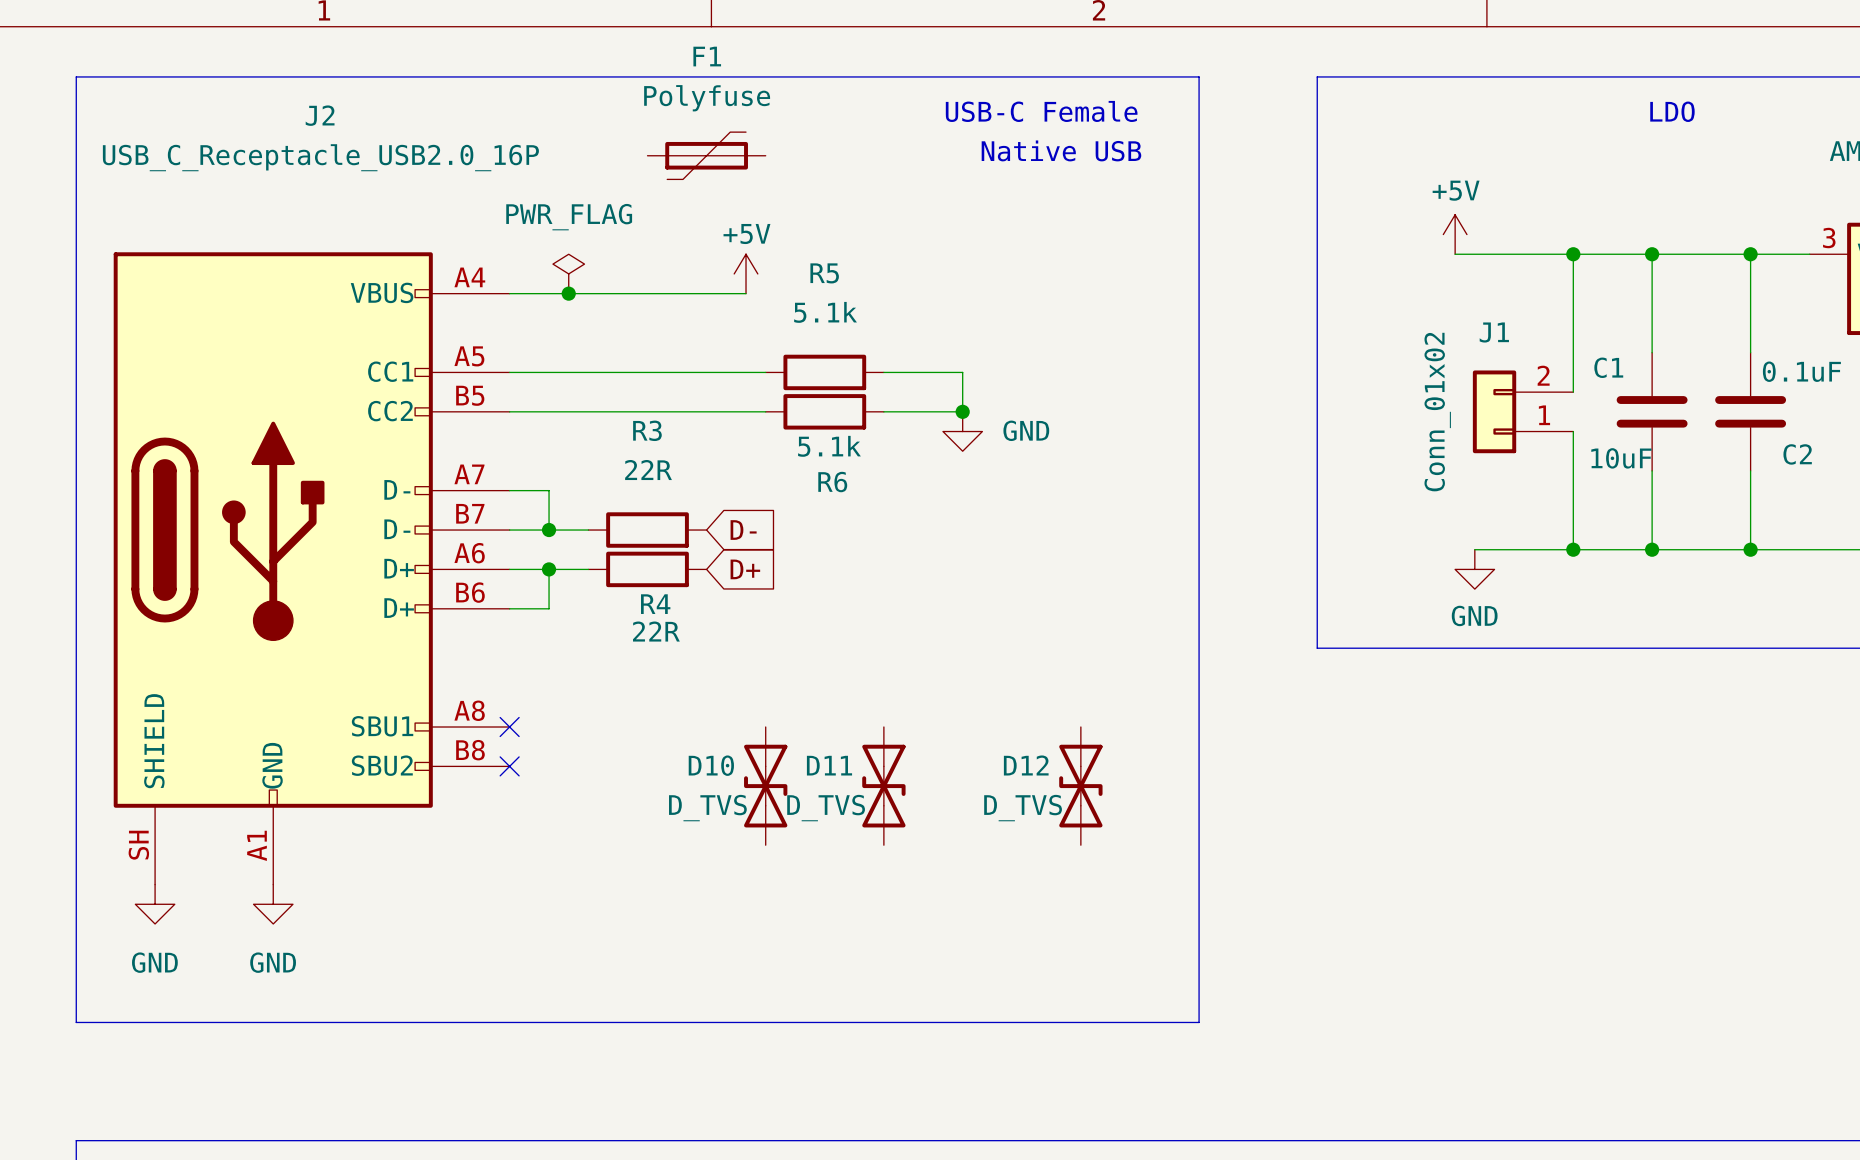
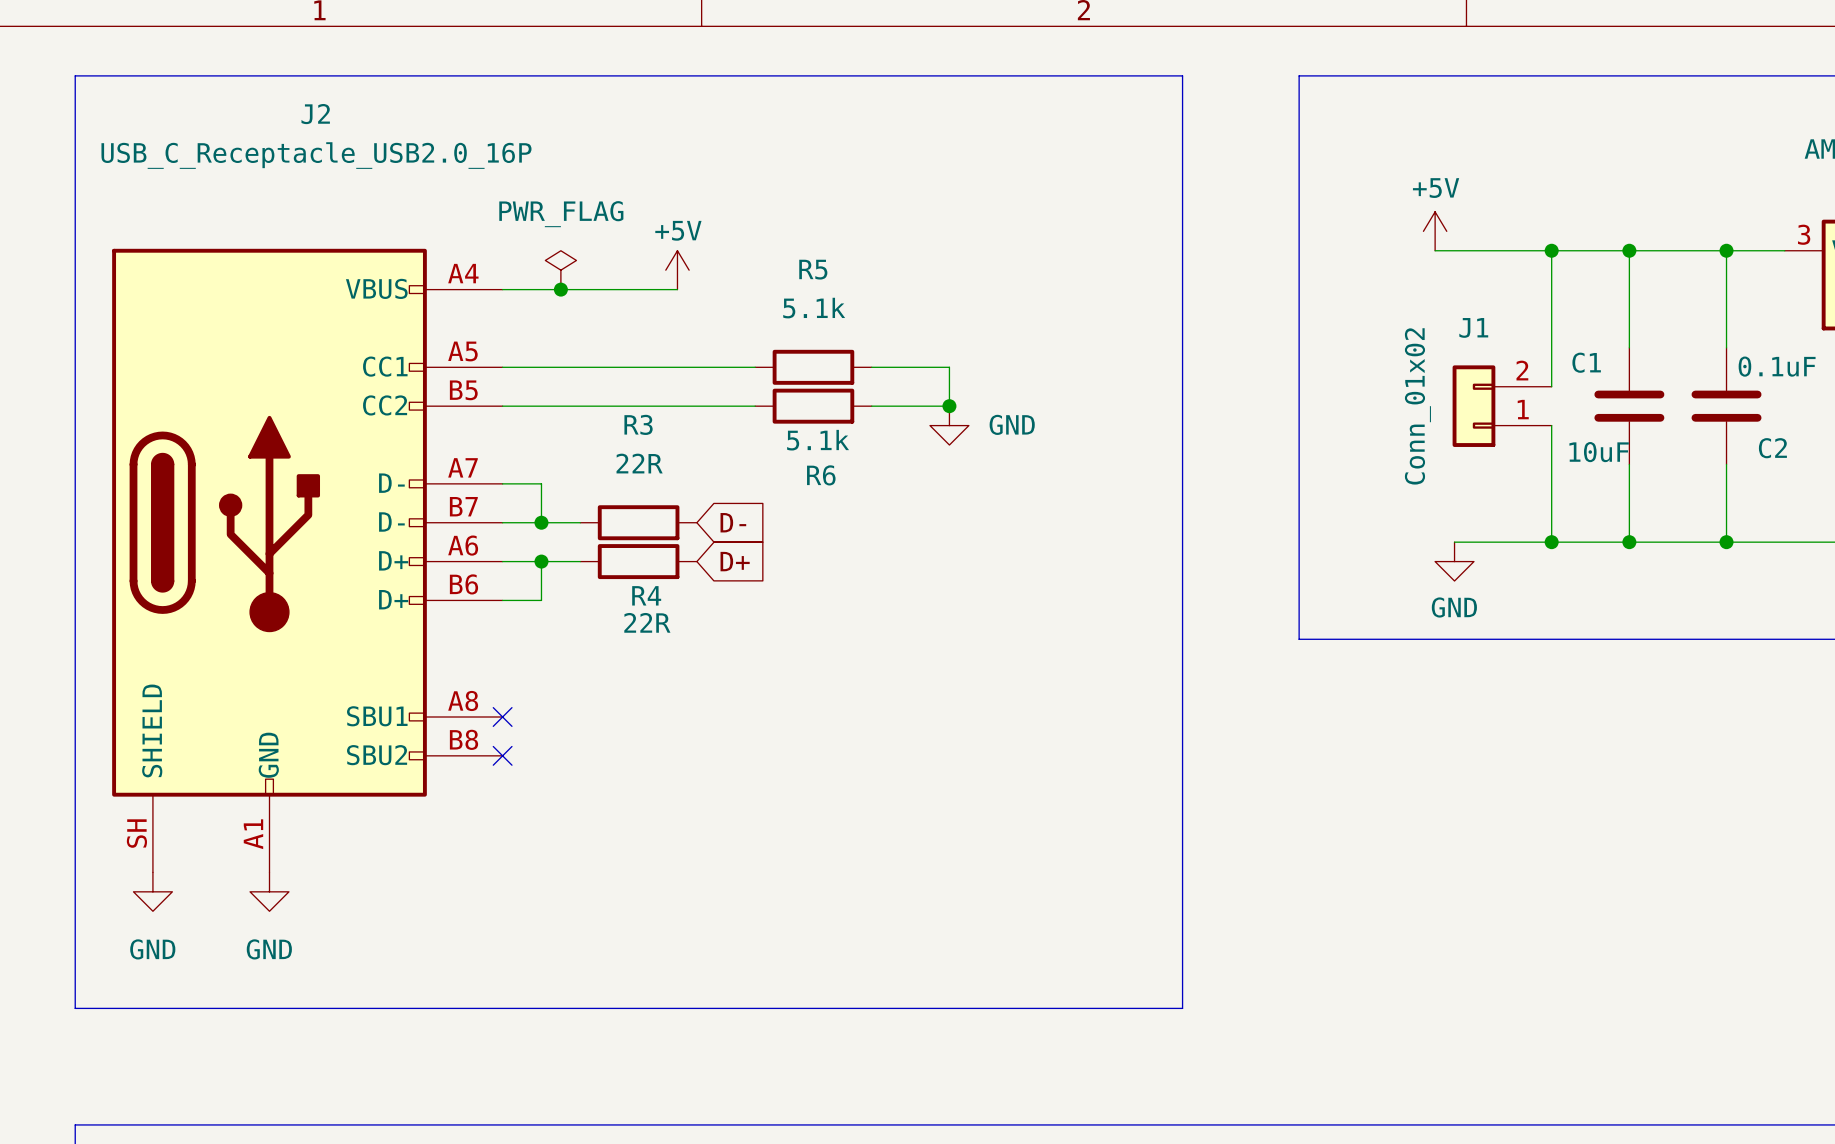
text: USB-C Female (1041, 111) -> none
text: LDO (1672, 111) -> none
text: Native USB (1061, 150) -> none
F1: Polyfuse (706, 155) -> none
power symbol position: +5V (746, 273) -> +5V (677, 270)
wire: (686, 293) (746, 293) -> none
D10: D_TVS (765, 786) -> none
D11: D_TVS (883, 786) -> none
D12: D_TVS (1080, 786) -> none

